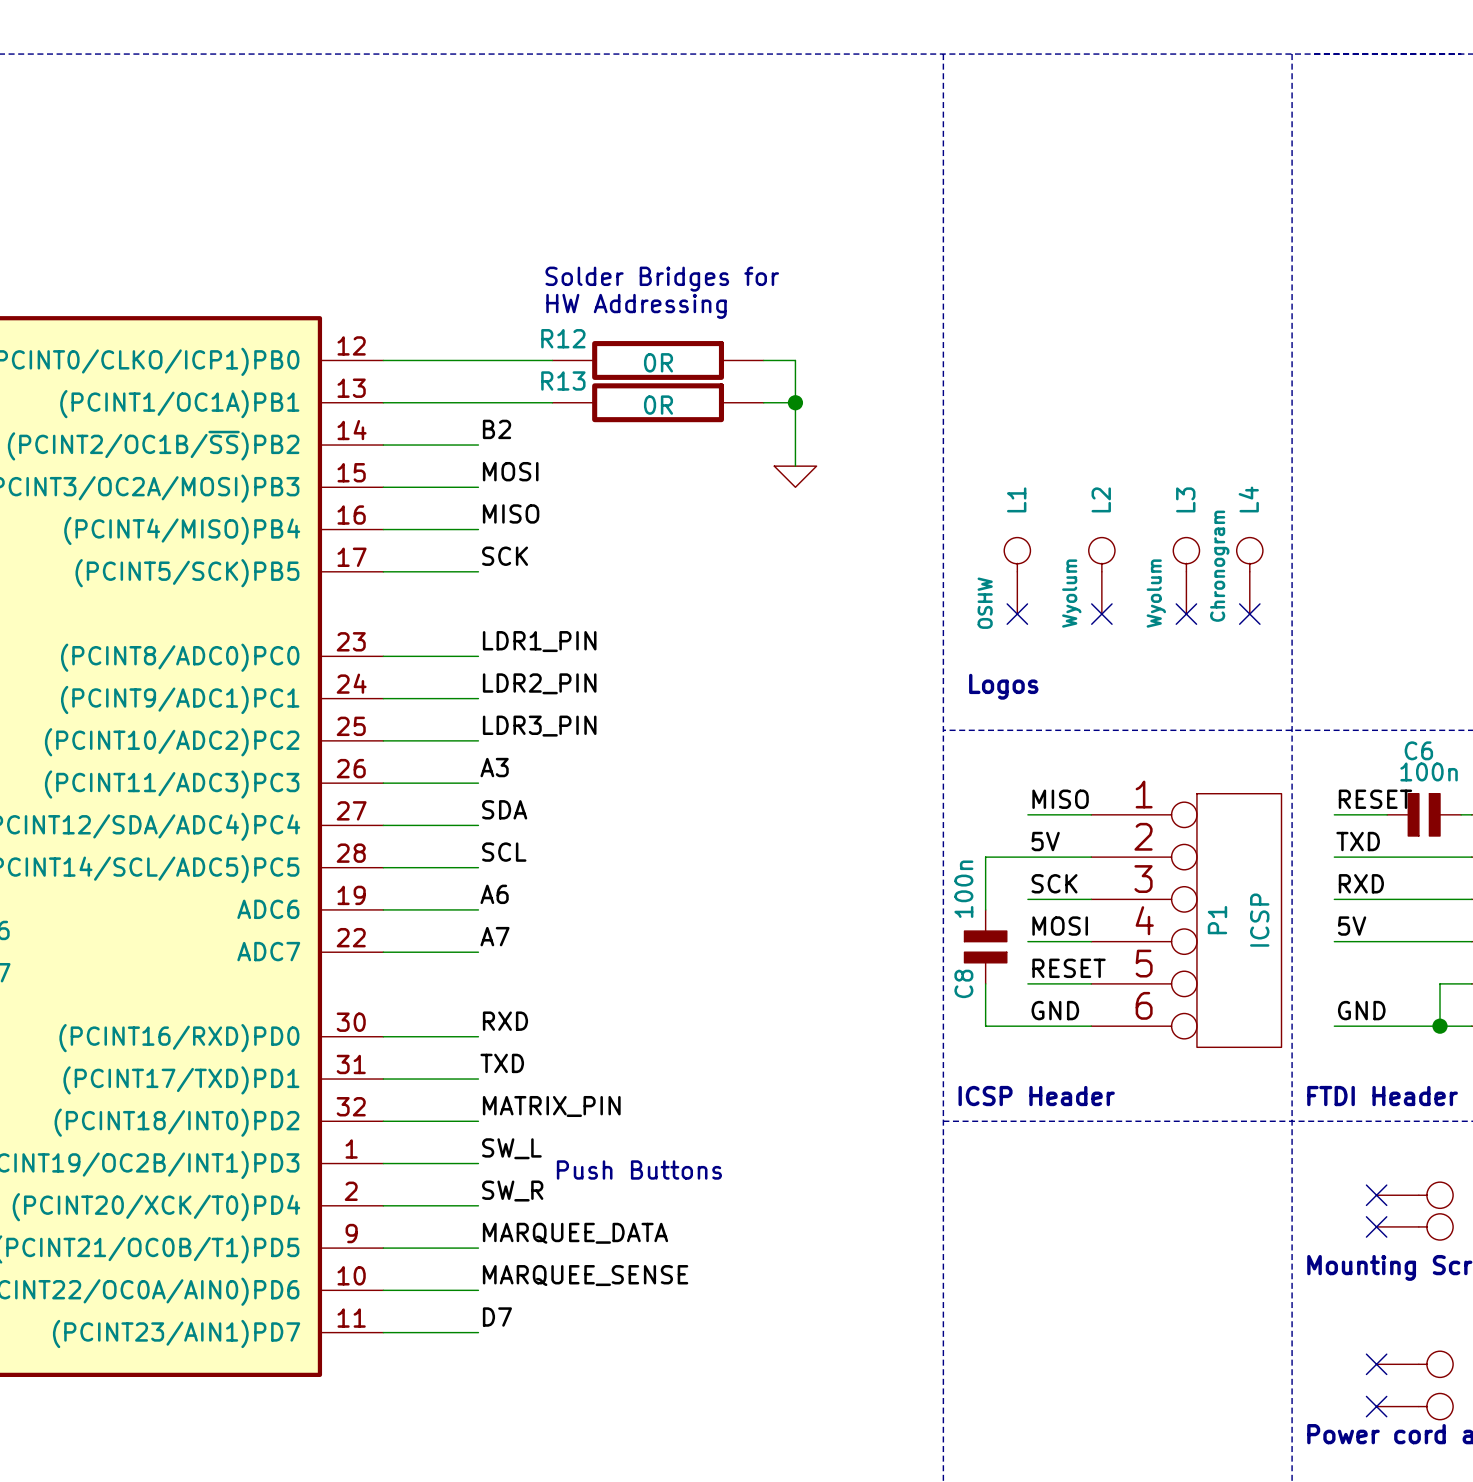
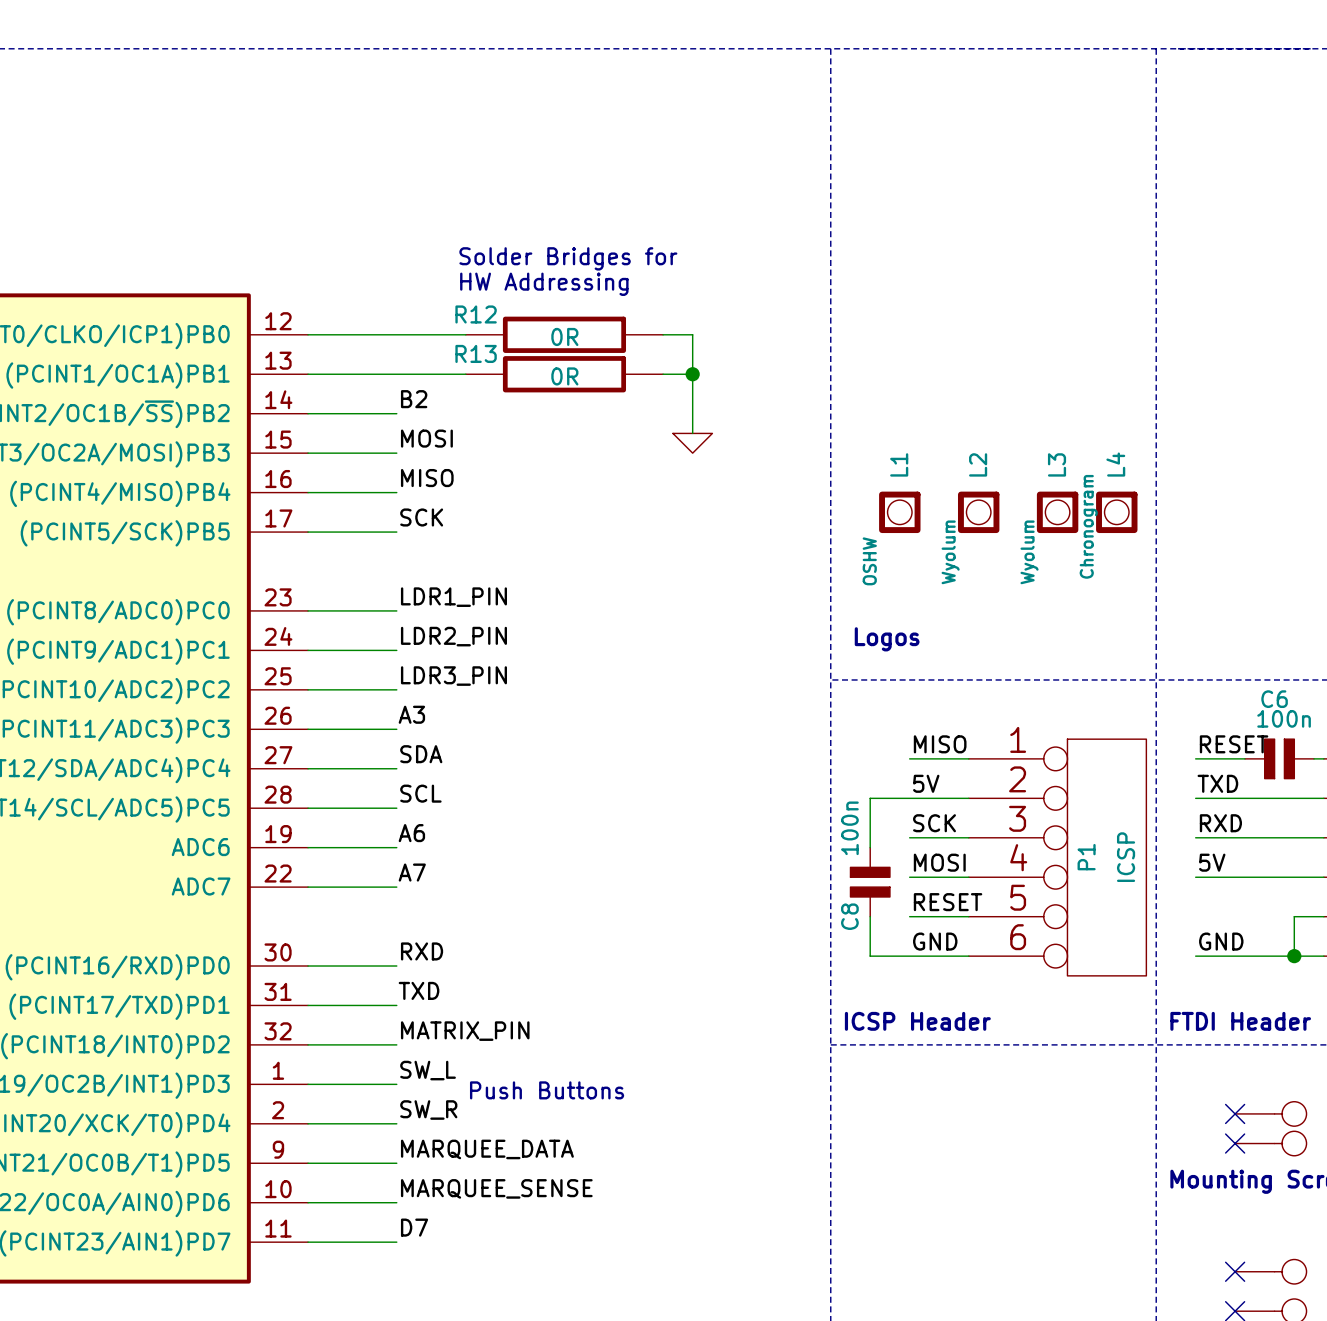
L1 symbol: [1004, 537, 1031, 615] -> [879, 491, 921, 534]
L2 symbol: [1088, 537, 1115, 615] -> [957, 491, 1000, 534]
L3 symbol: [1173, 537, 1200, 615] -> [1036, 491, 1079, 534]
L4 symbol: [1236, 537, 1263, 615] -> [1096, 491, 1138, 534]
no-connect mark: (1017, 614) -> none
no-connect mark: (1101, 614) -> none
no-connect mark: (1186, 614) -> none
no-connect mark: (1249, 614) -> none

